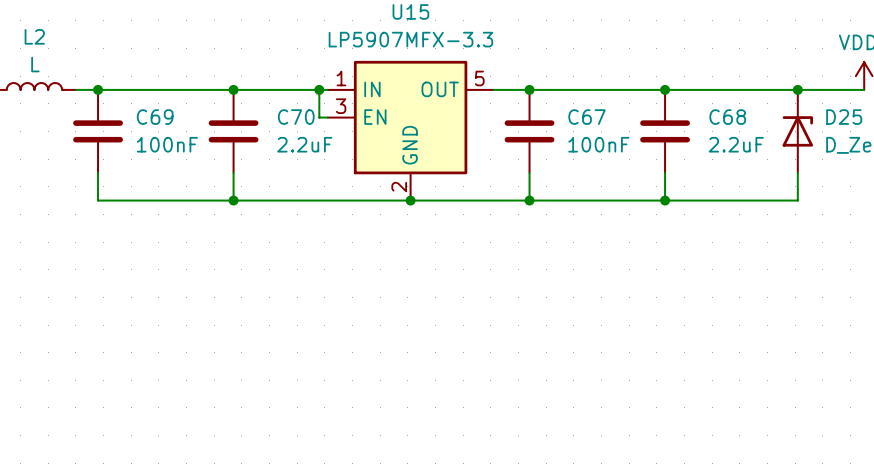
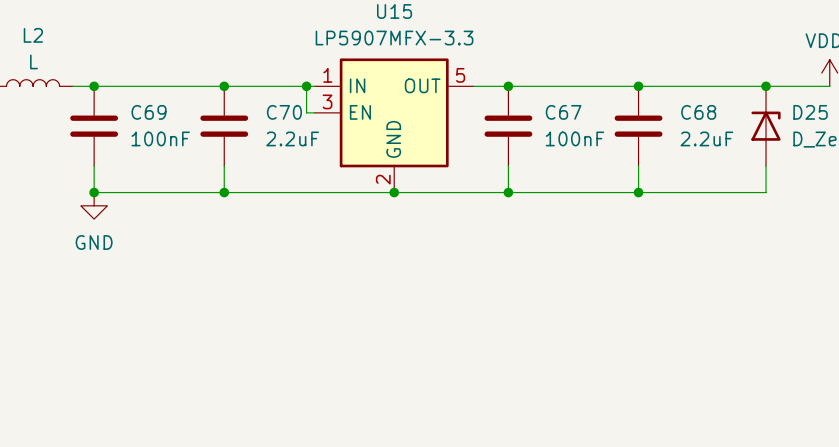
junction: none -> (94, 192)
power symbol: none -> GND (94, 205)

